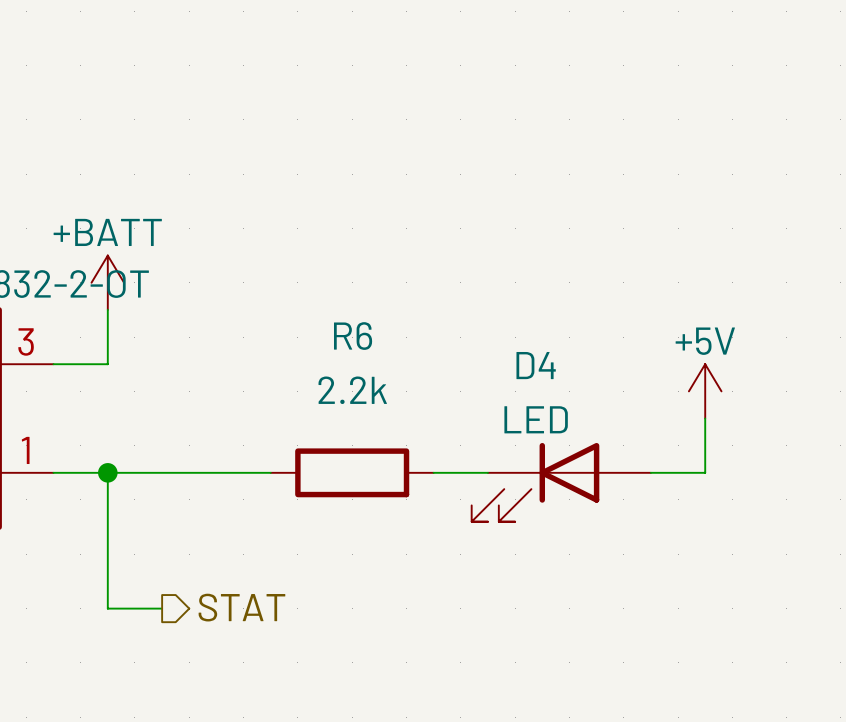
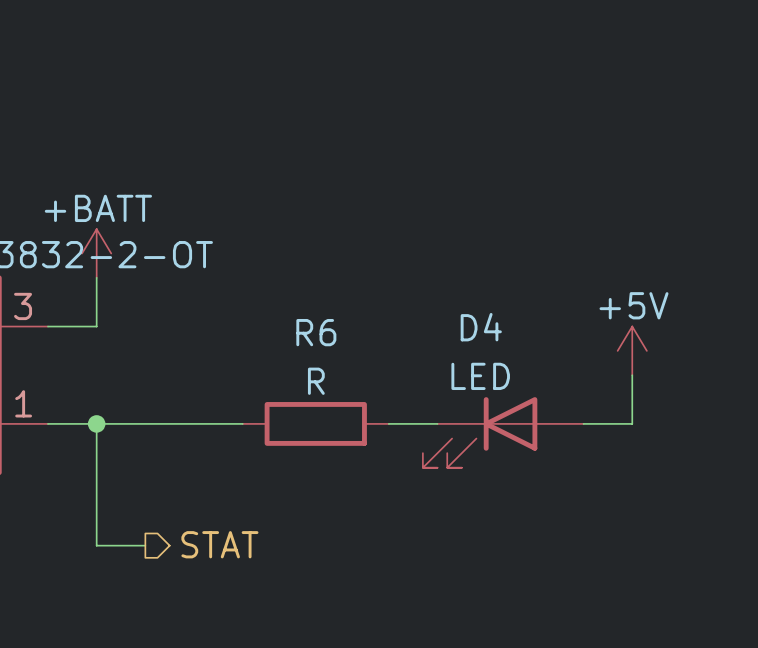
R6 name position: R6 (353, 336) -> R6 (316, 332)
R6 value: 2.2k (352, 390) -> R (316, 381)

